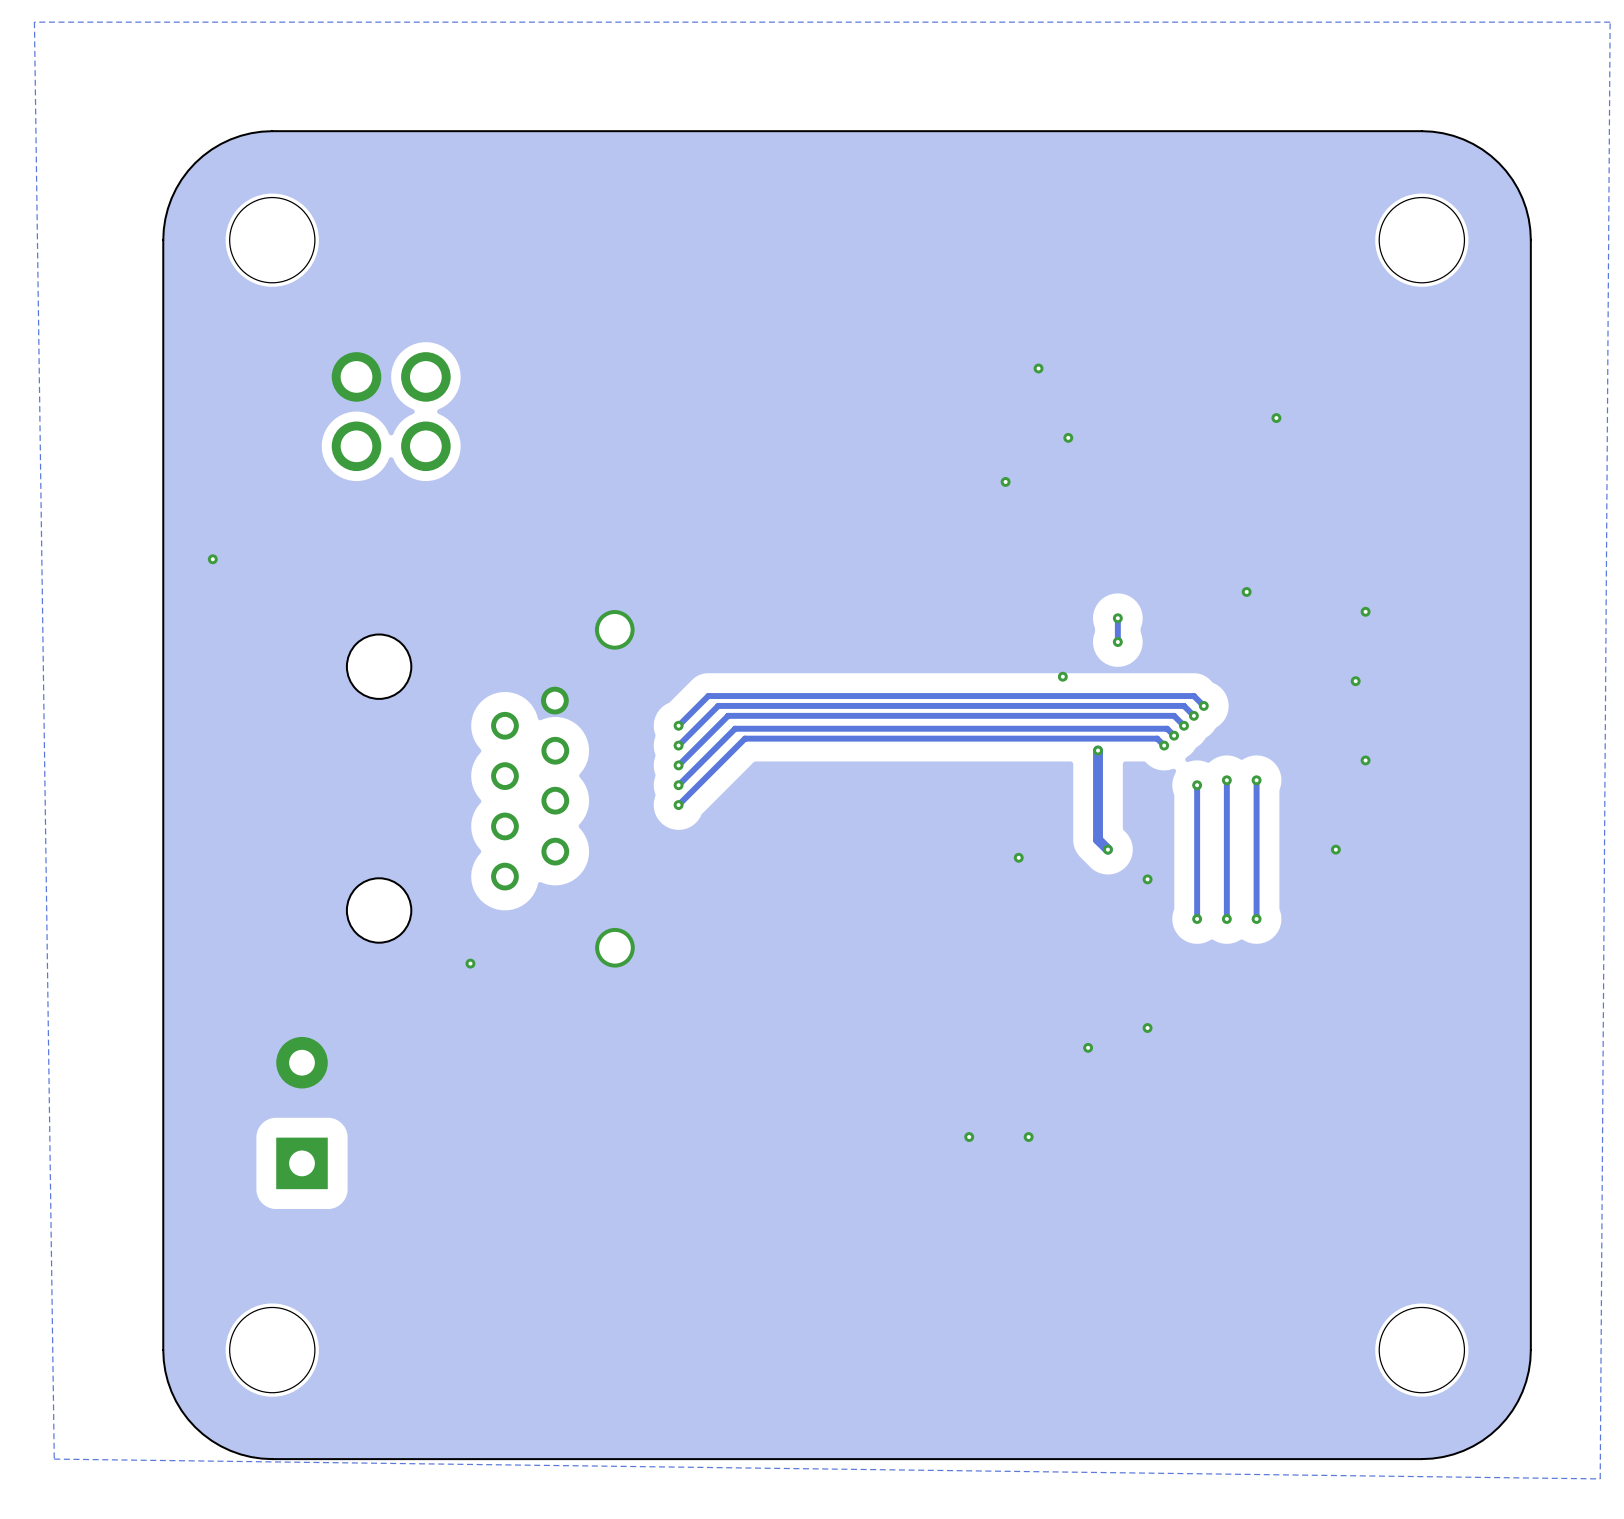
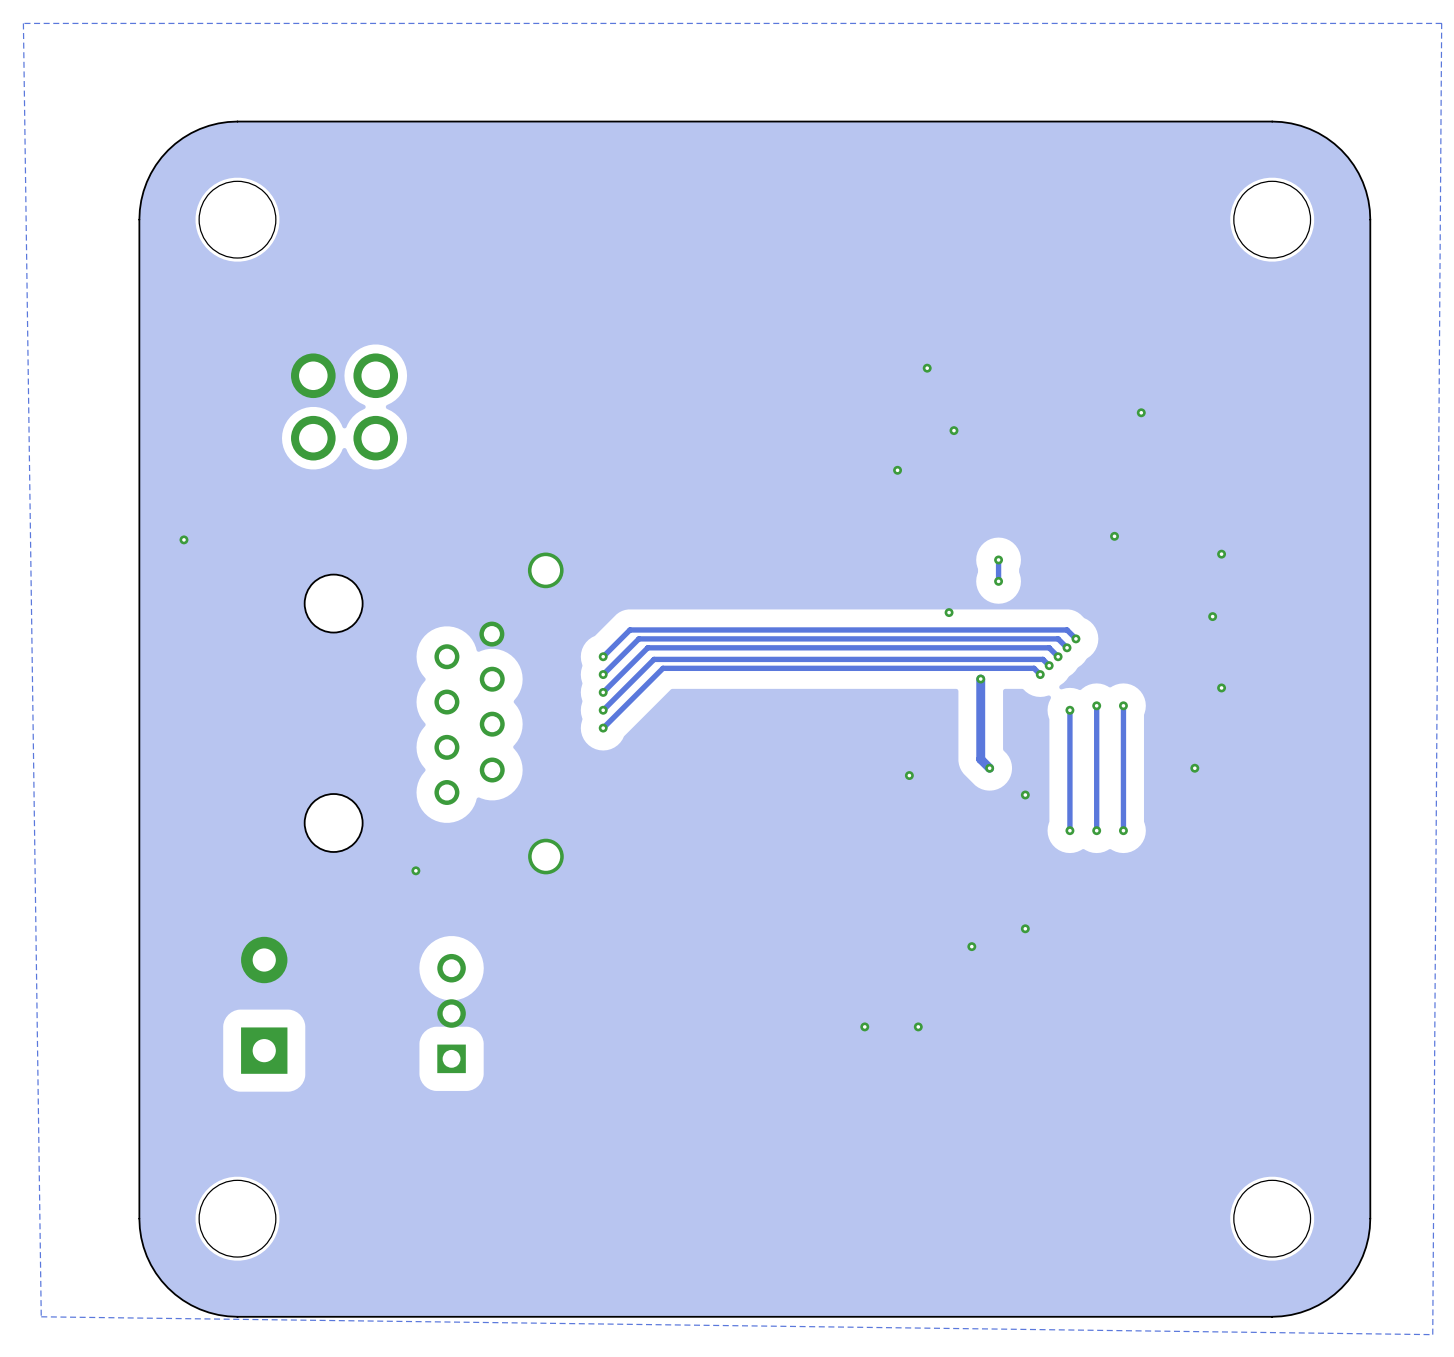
via: (1038, 368) -> none
via: none -> (927, 368)
part position: (391, 411) -> (344, 406)
via position: (1276, 418) -> (1141, 412)
via: (1068, 437) -> none
via: none -> (953, 430)
via: (1005, 481) -> none
via: none -> (897, 470)
via position: (212, 559) -> (183, 539)
part: none -> (451, 1013)

